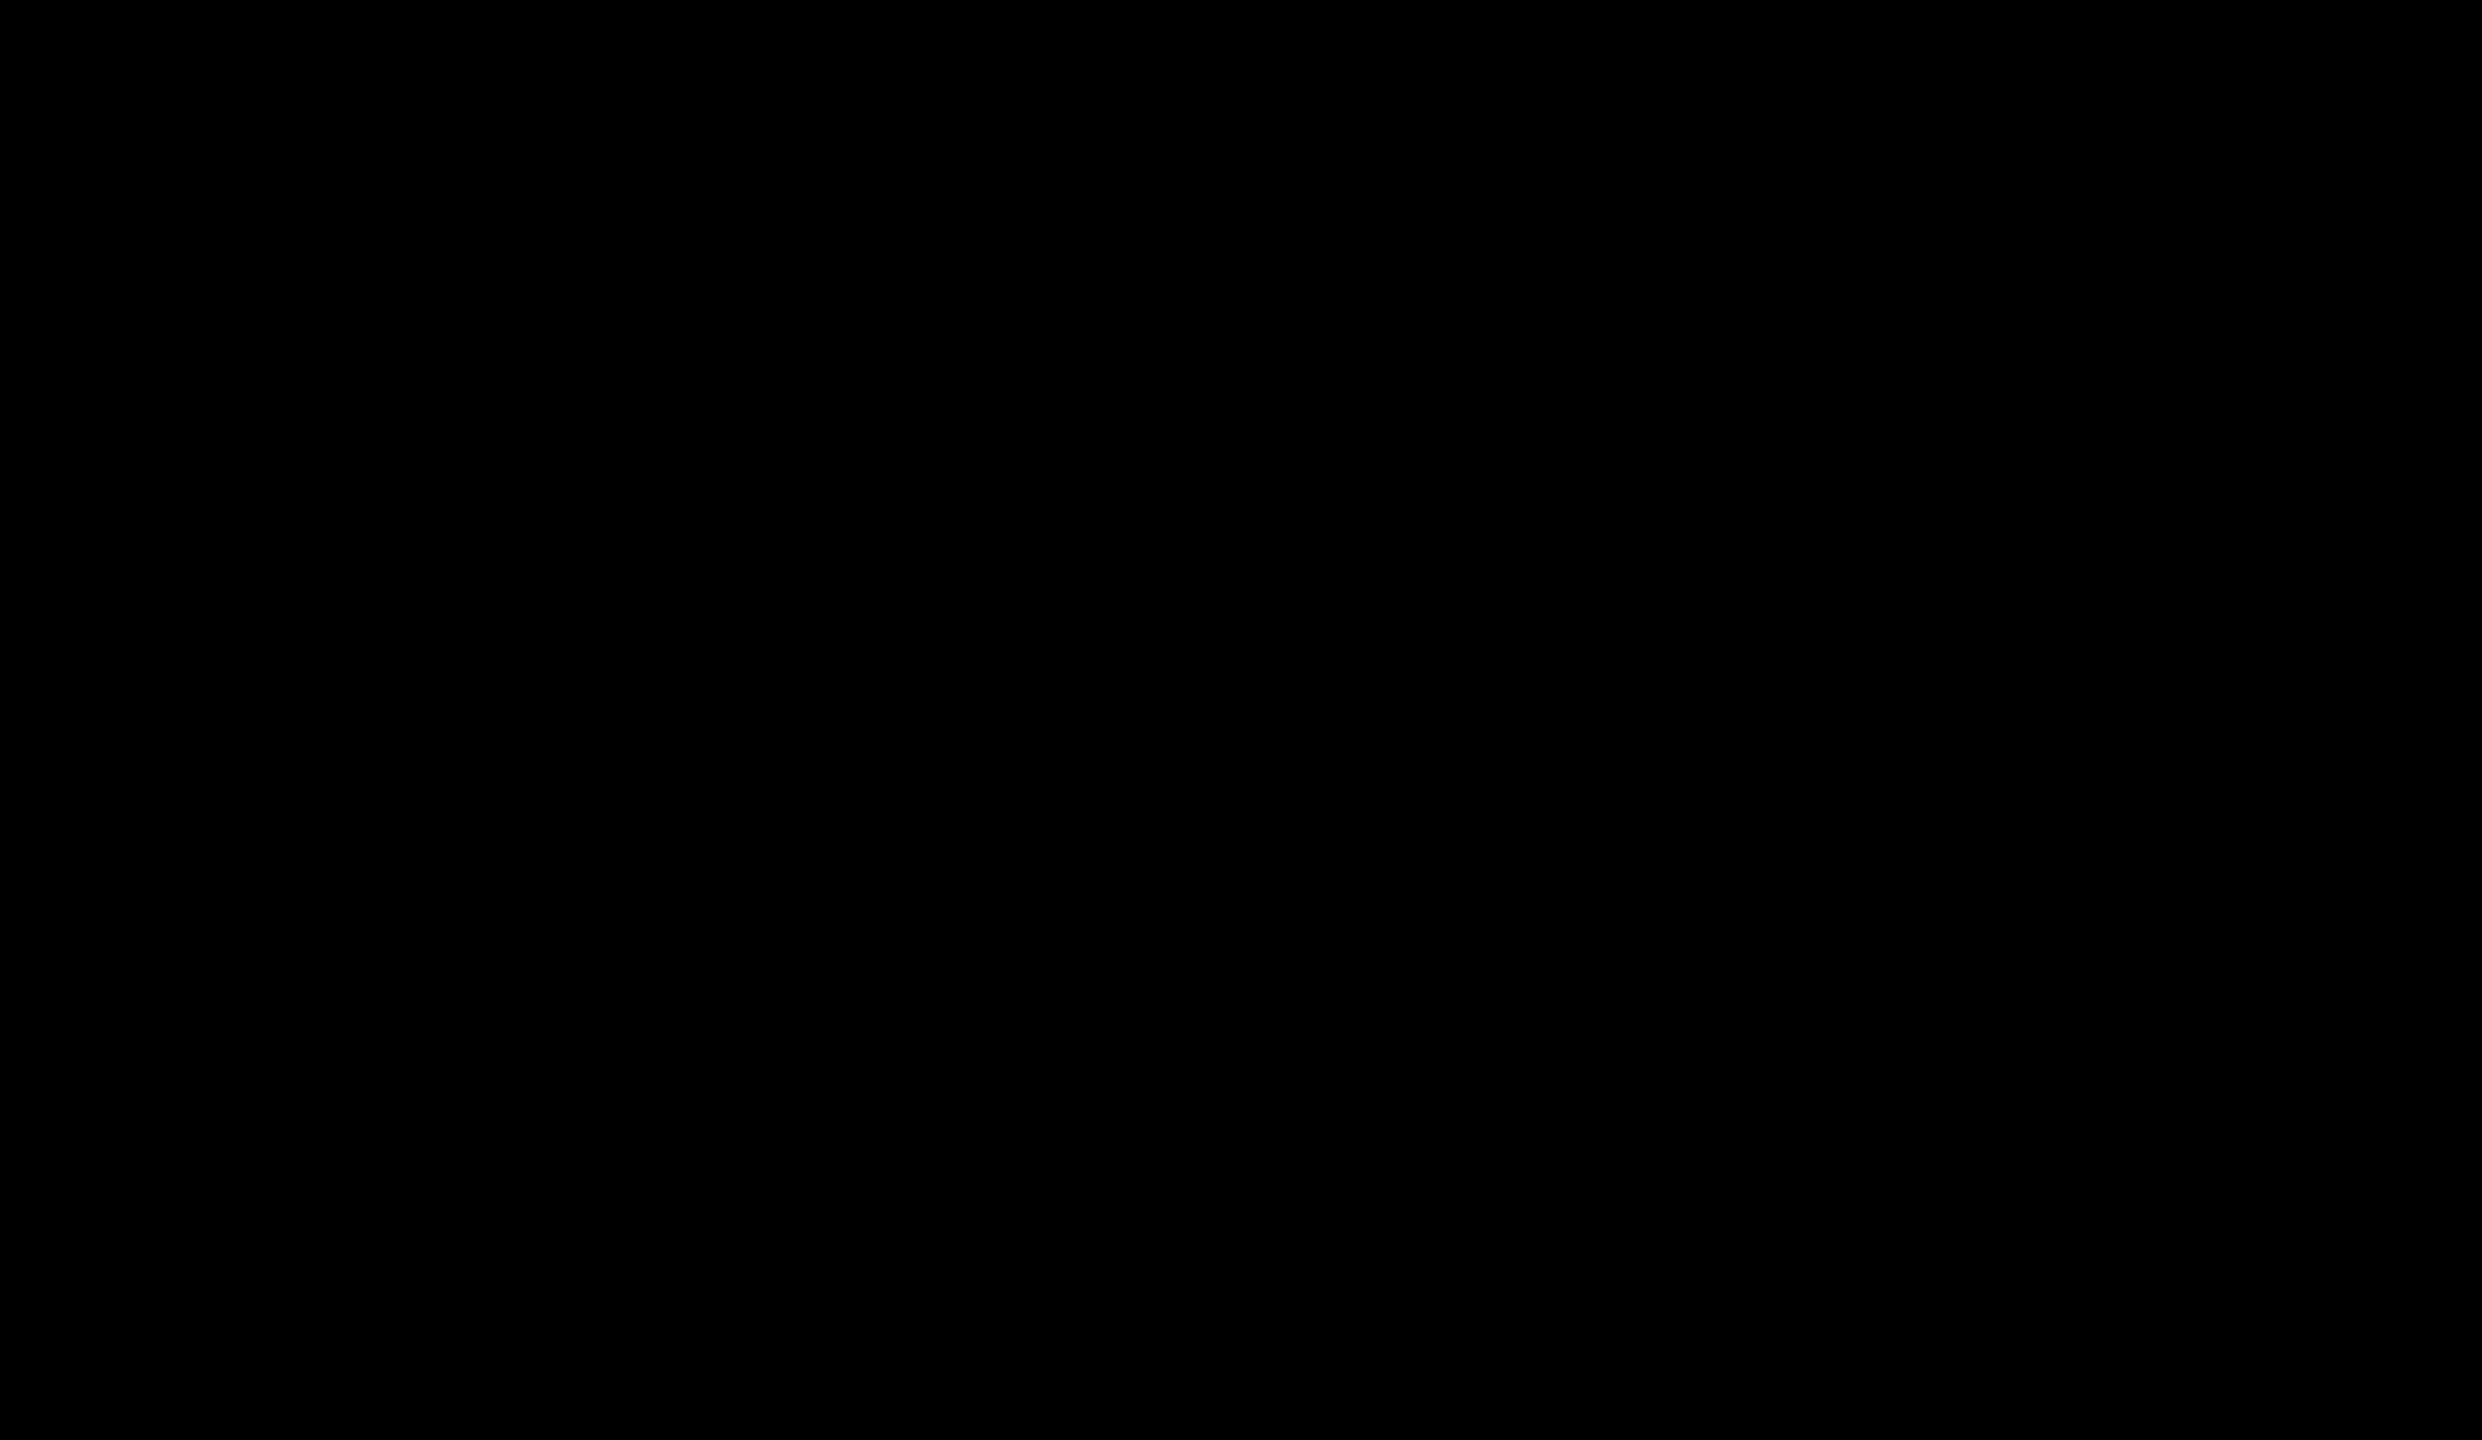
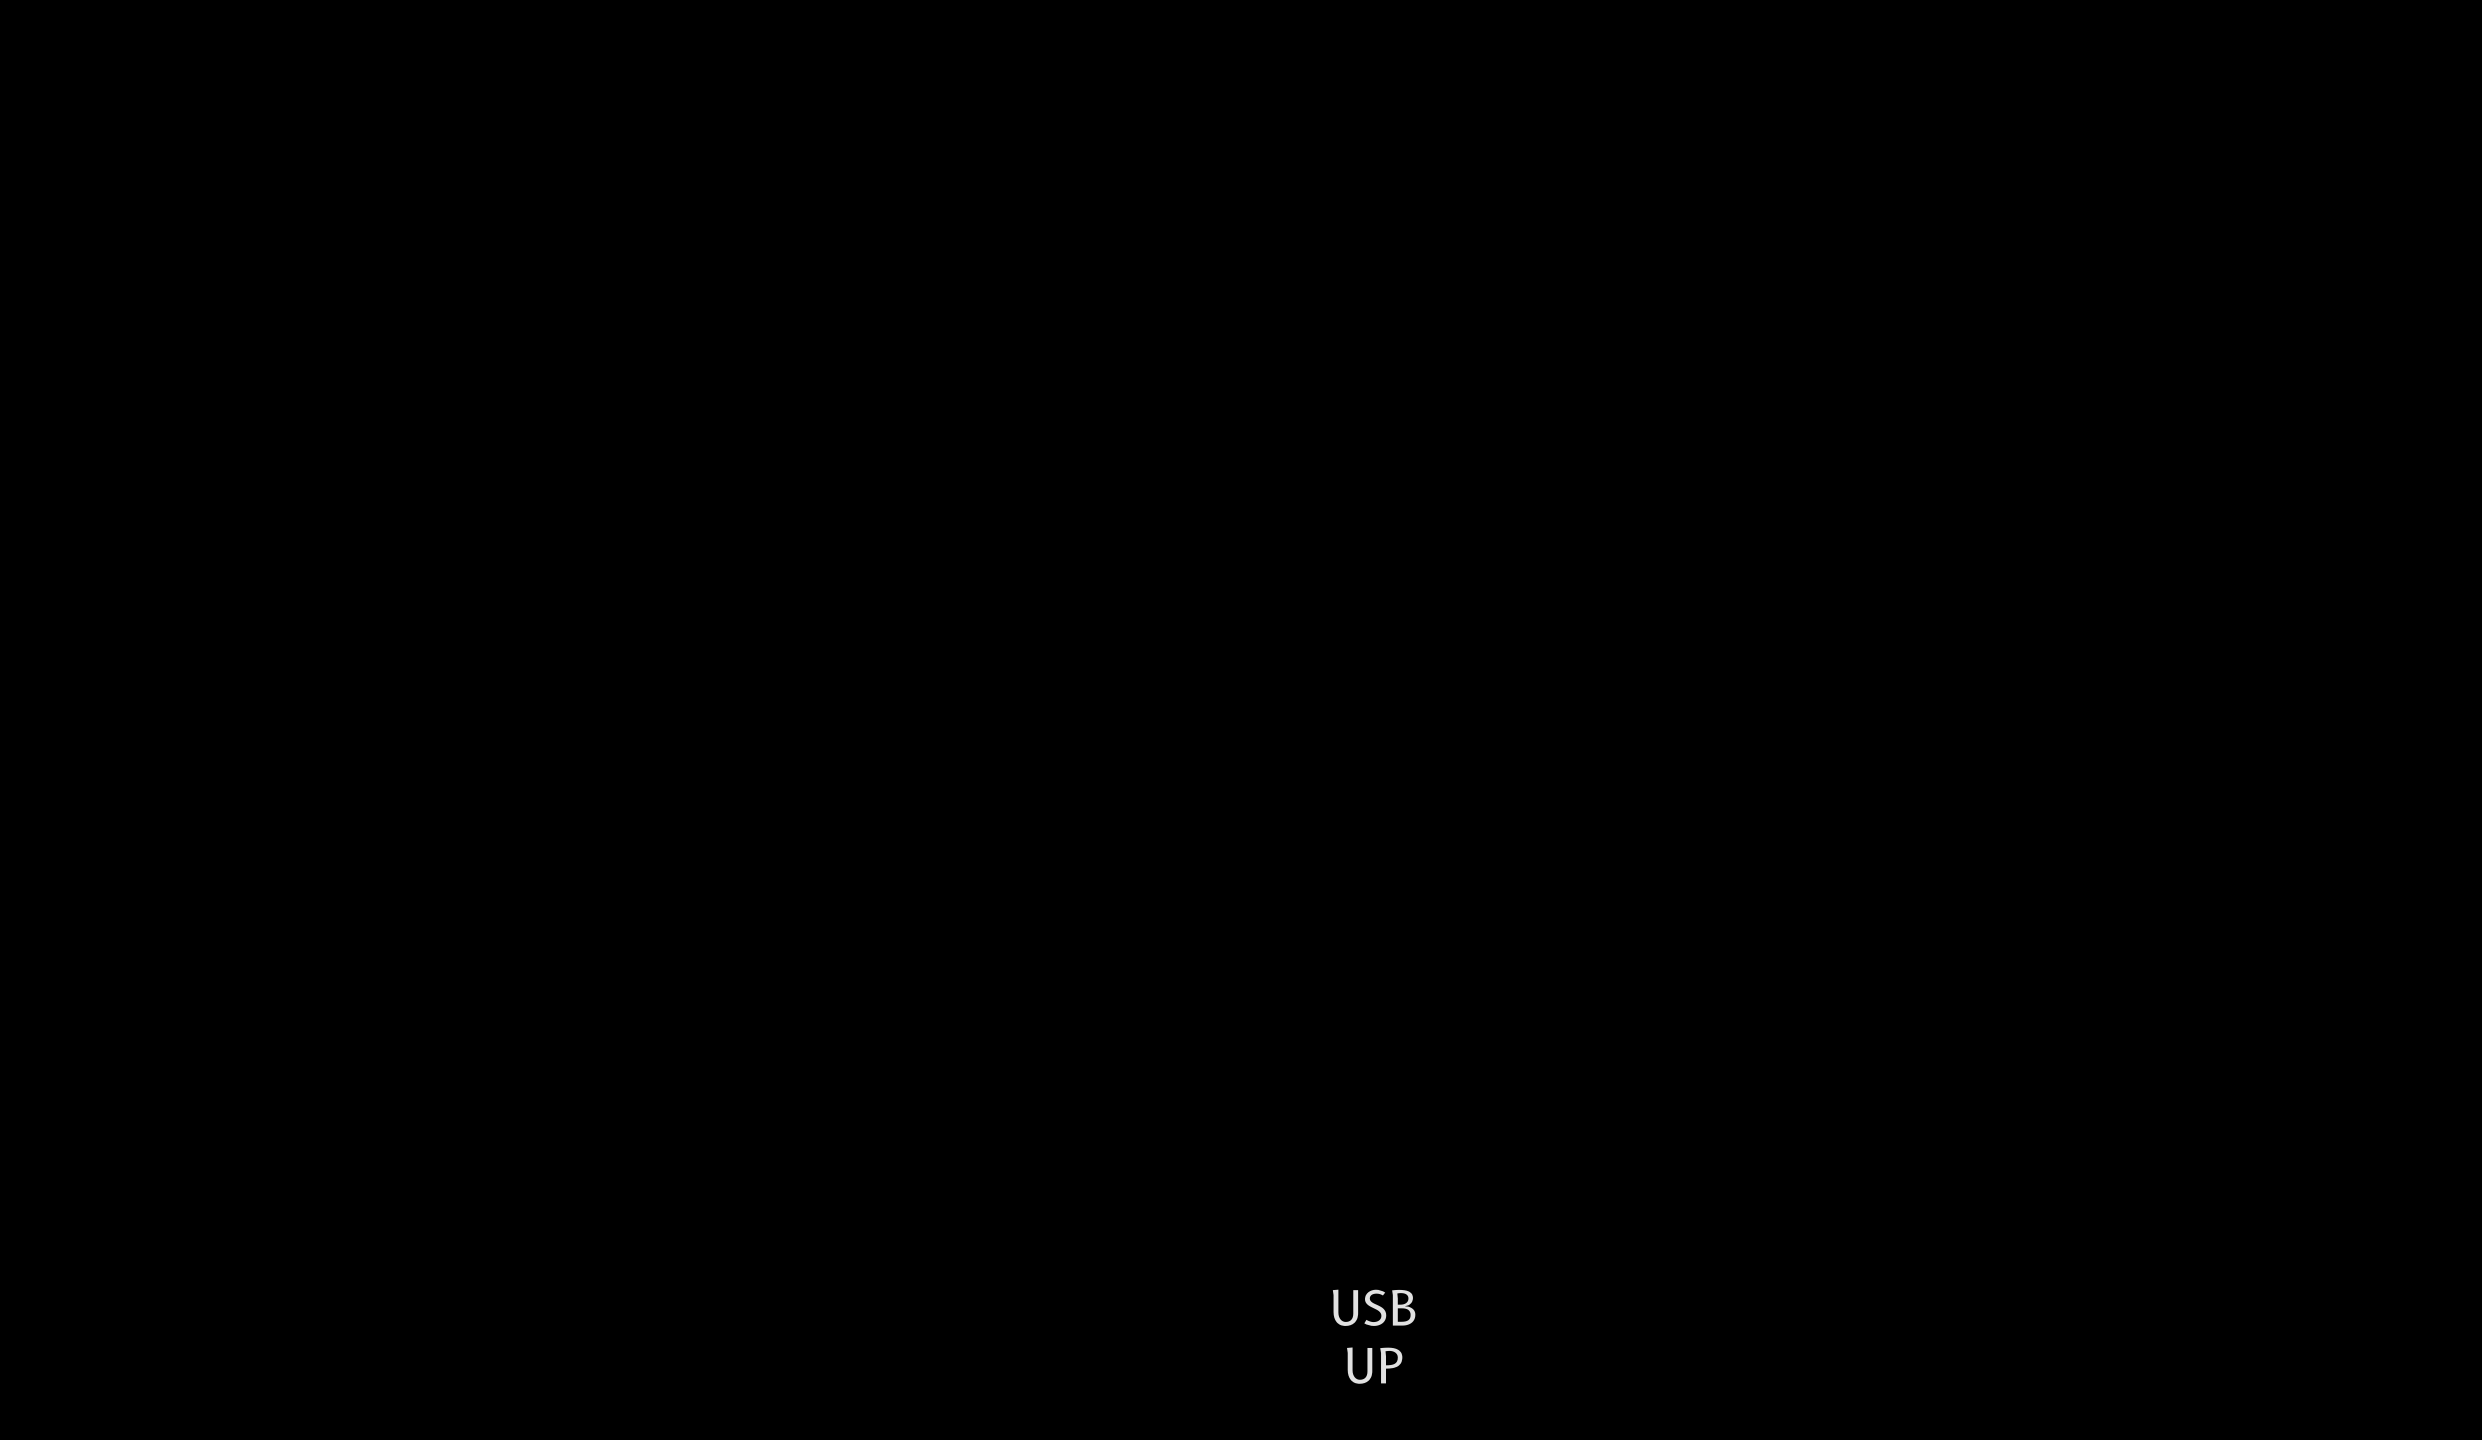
text: none -> USB (1374, 1307)
text: none -> UP (1374, 1365)

